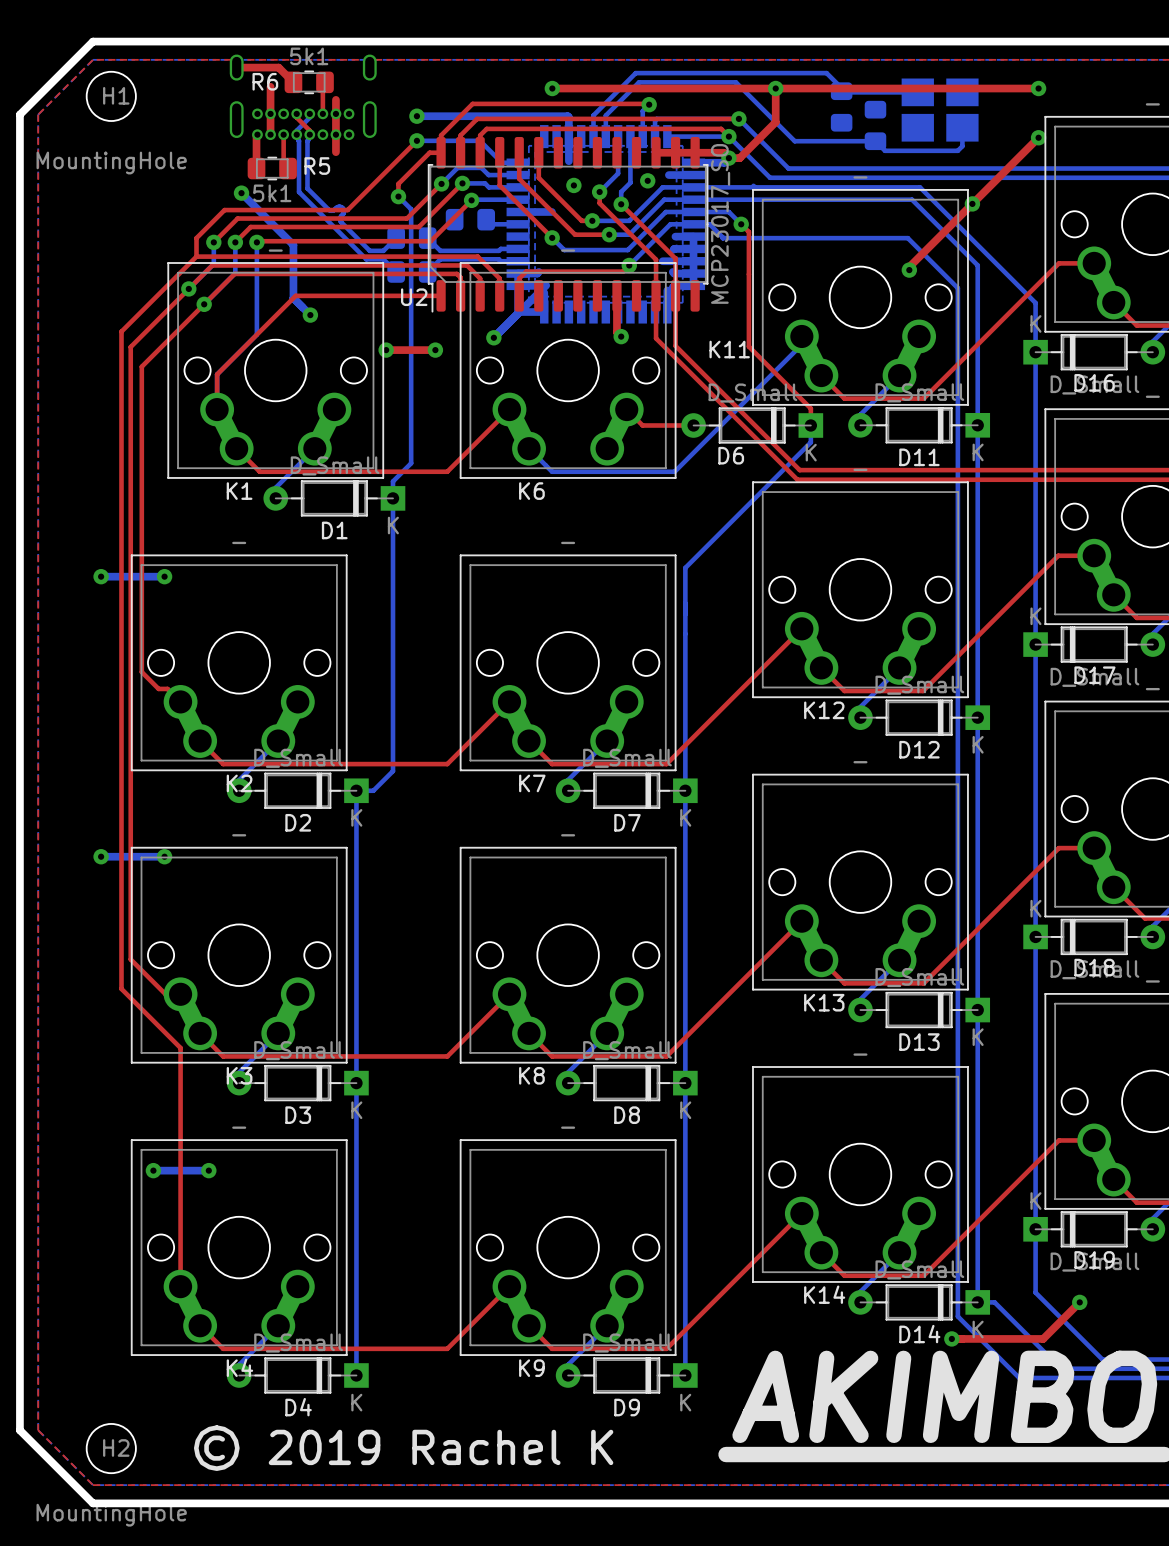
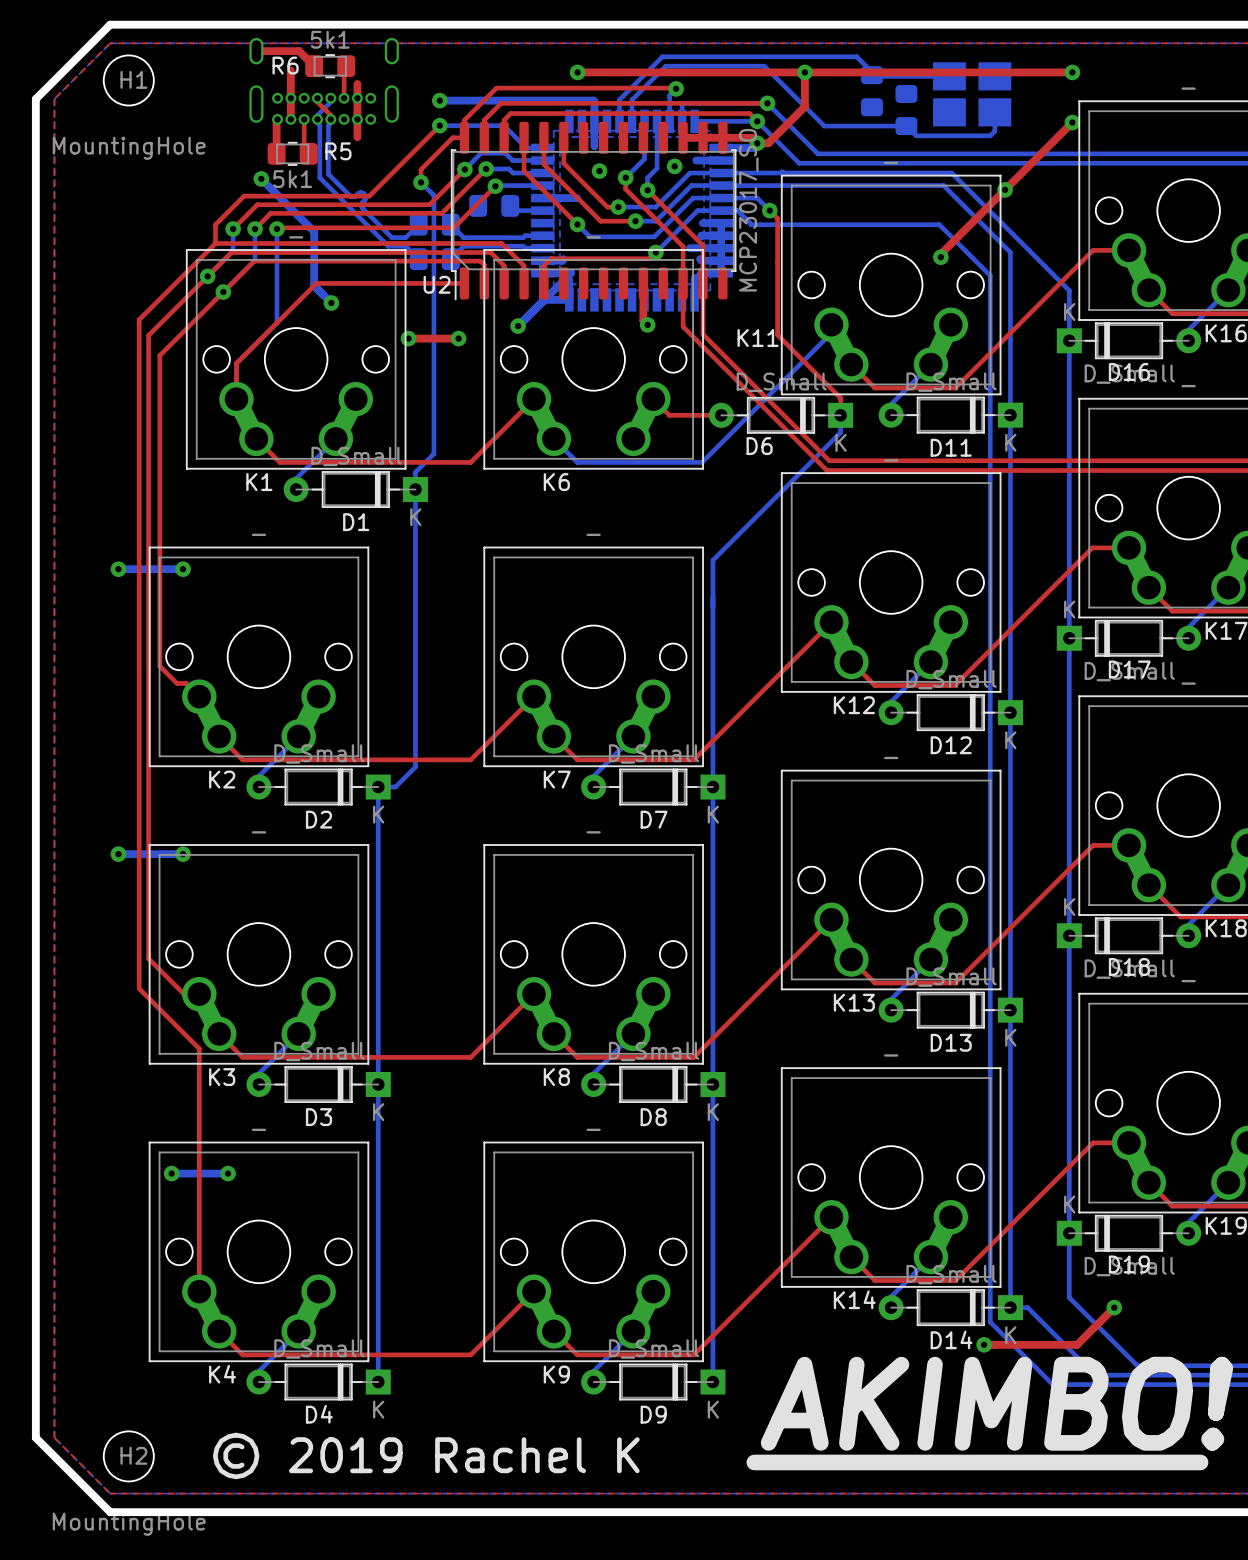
K2 name position: K2 (239, 783) -> K2 (222, 779)
K3 name position: K3 (239, 1075) -> K3 (222, 1077)
K4 name position: K4 (239, 1367) -> K4 (222, 1374)

